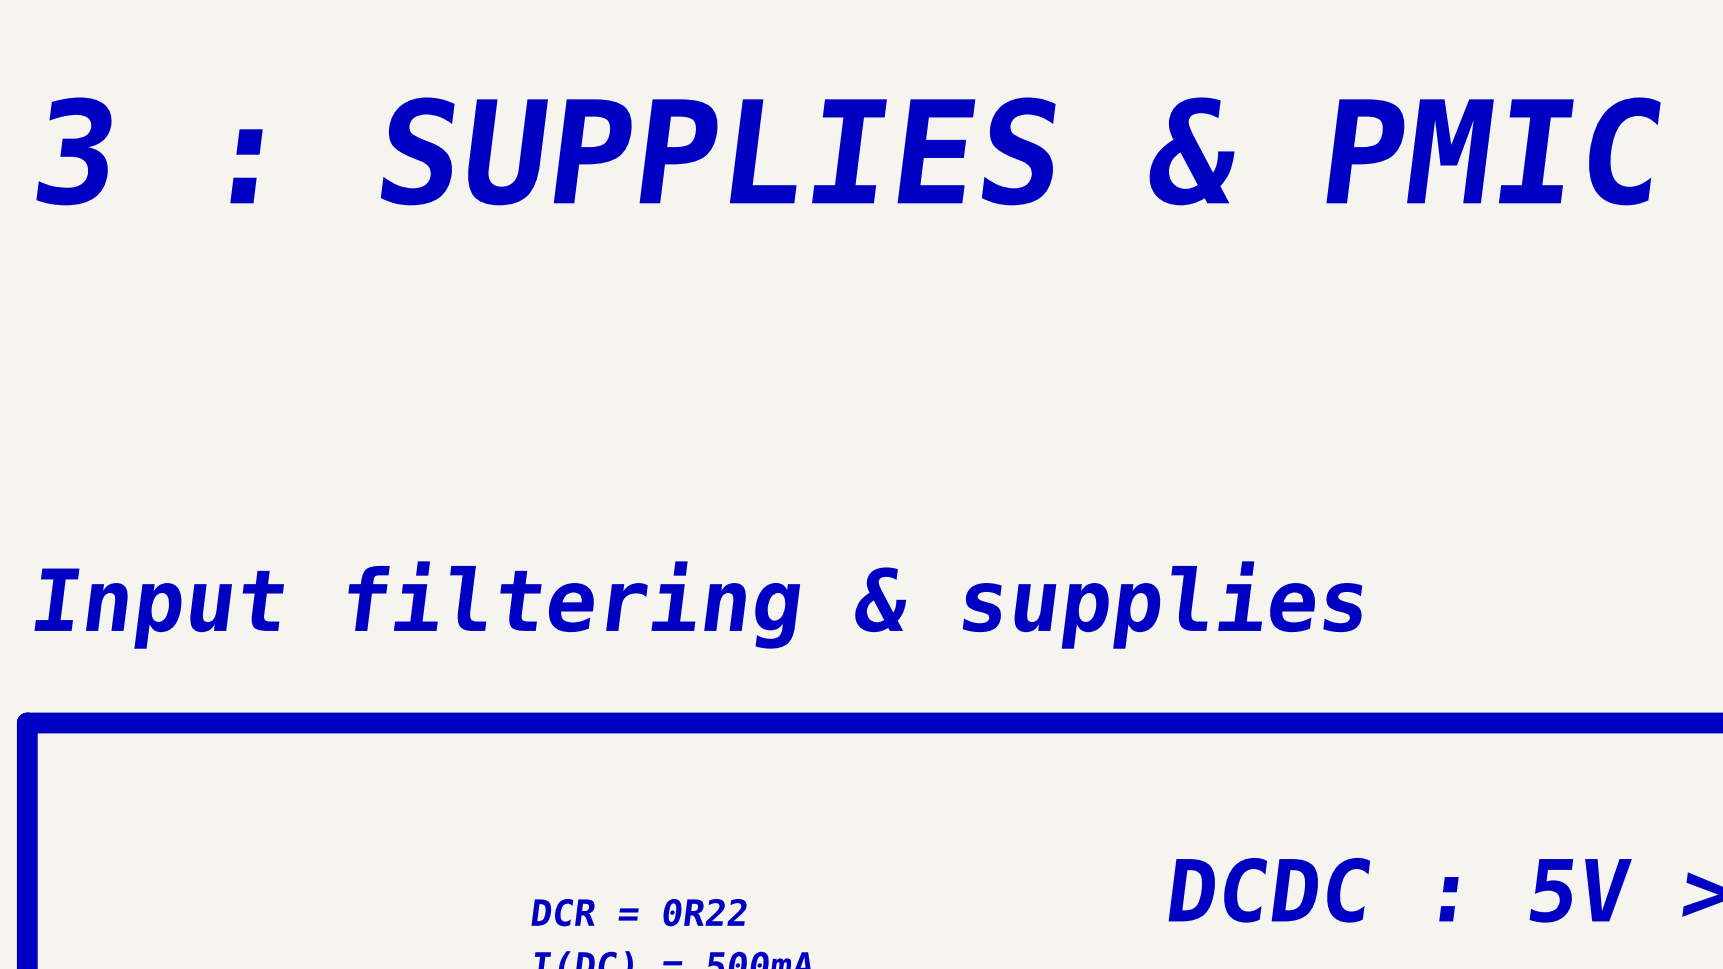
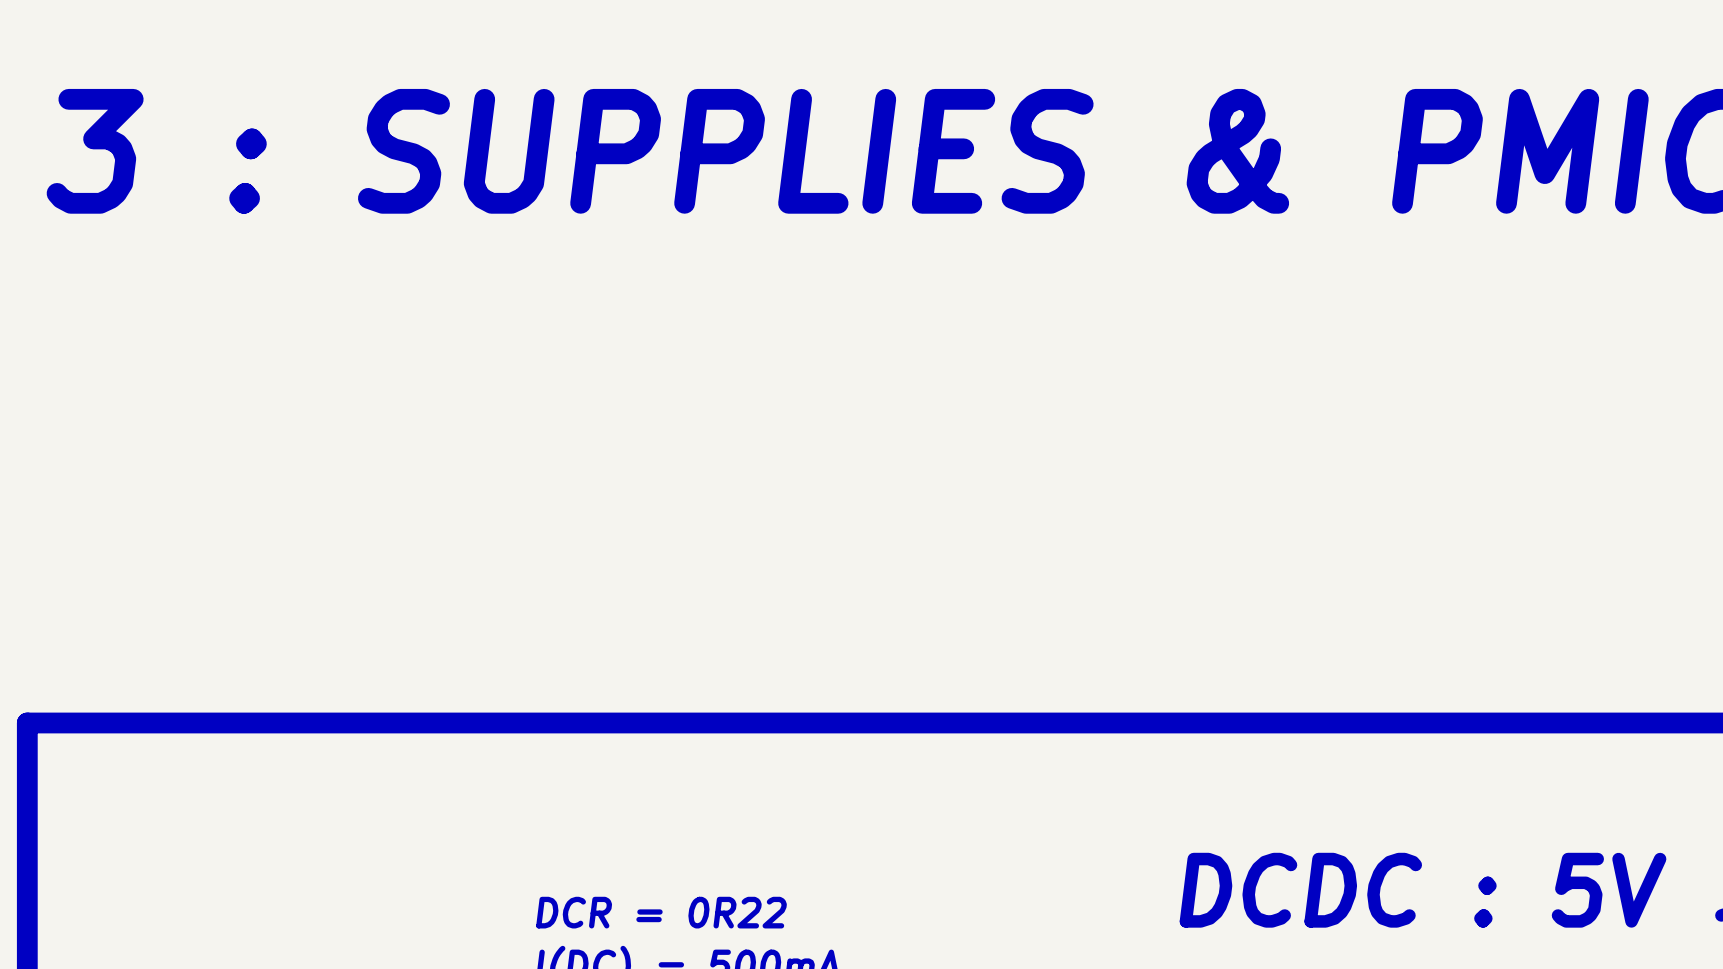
text: Input filtering & supplies (698, 605) -> none

